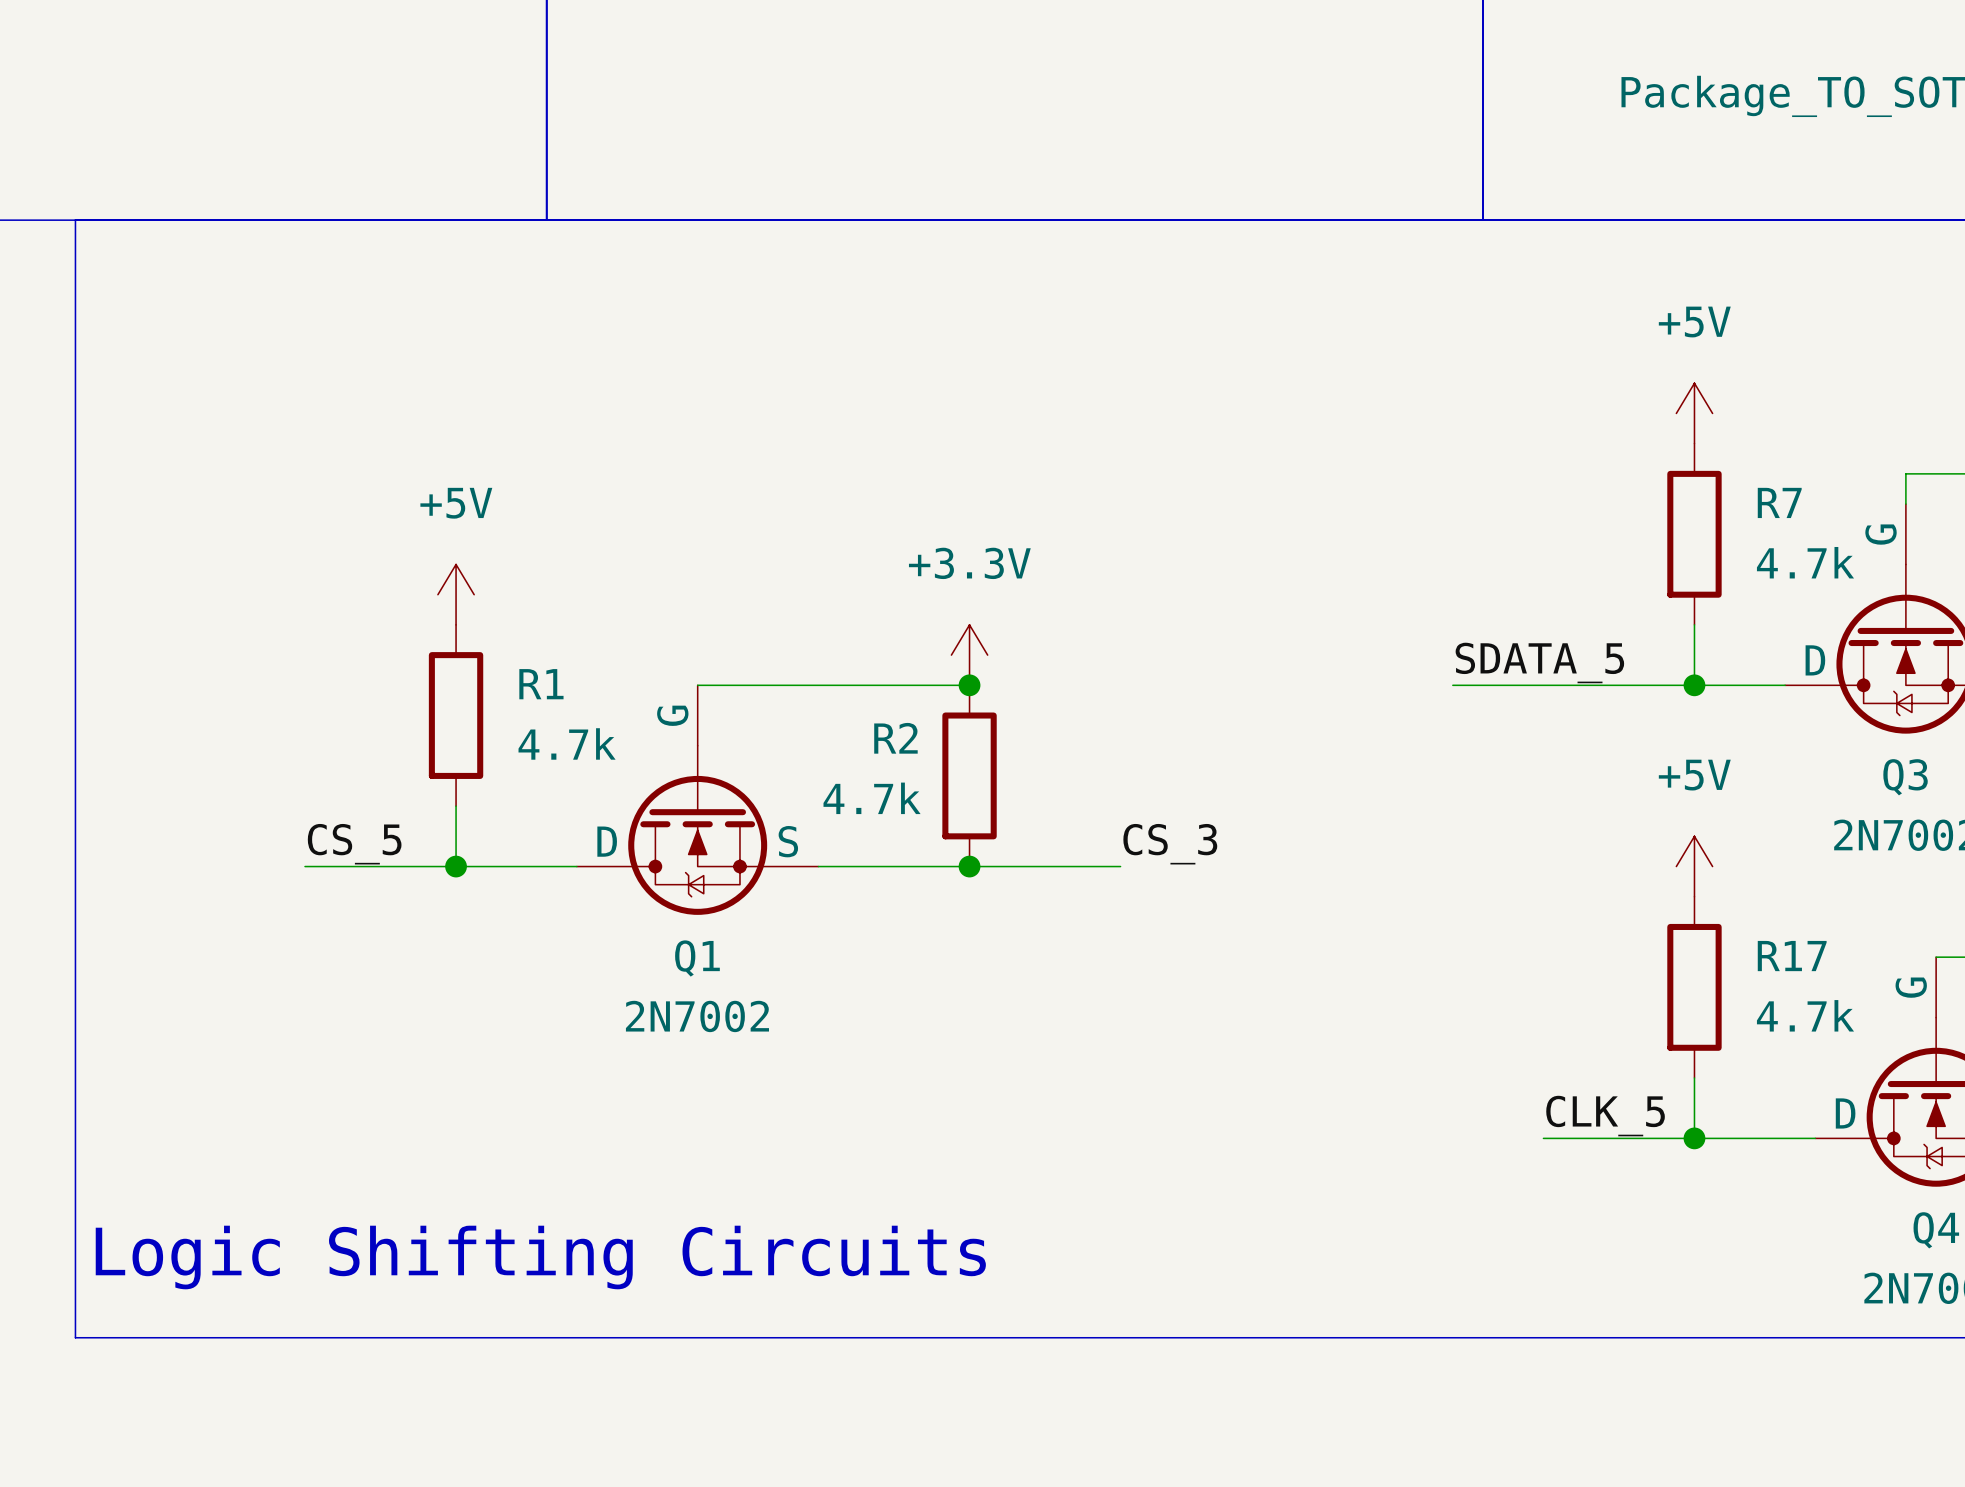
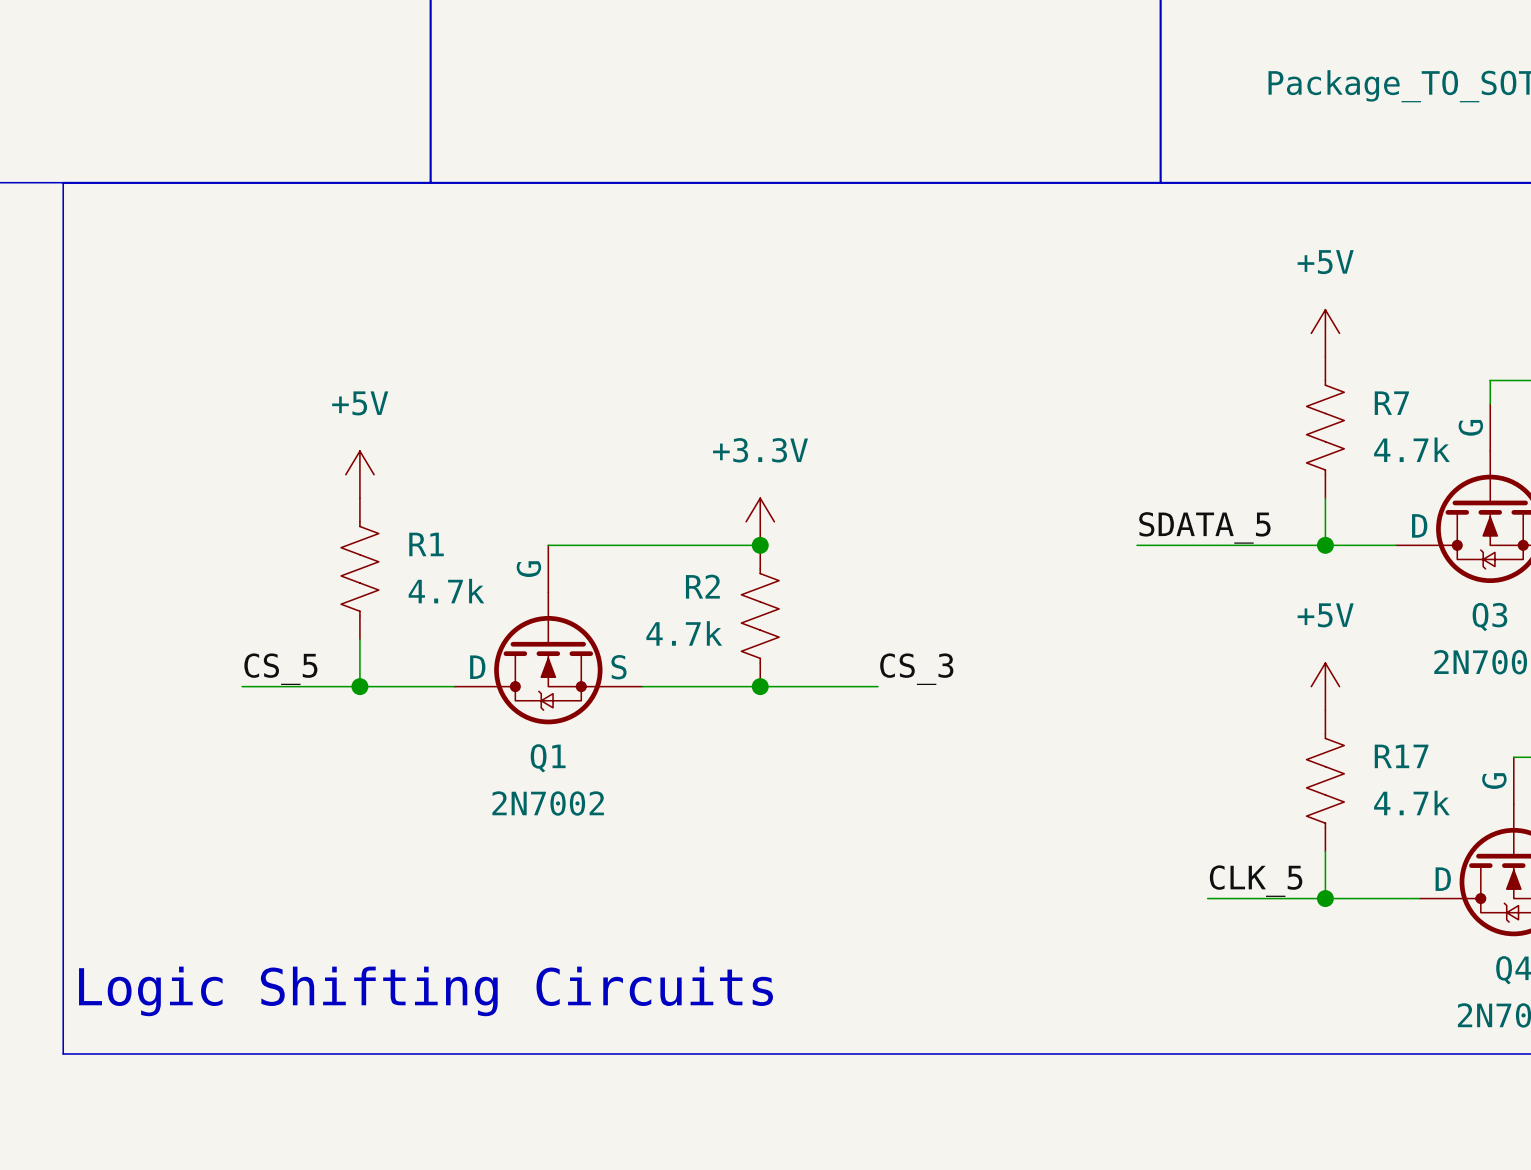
R7 symbol: [1667, 443, 1722, 625] -> [1306, 356, 1345, 499]
R1 symbol: [428, 624, 484, 807] -> [341, 498, 379, 640]
R2 symbol: [942, 685, 997, 867] -> [741, 545, 780, 687]
R17 symbol: [1667, 896, 1722, 1078] -> [1306, 710, 1345, 852]

